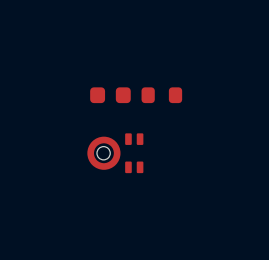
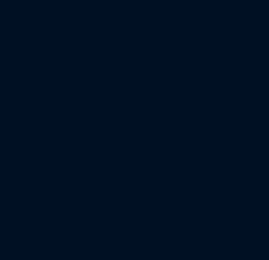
part: (110, 95) -> none
part: (161, 95) -> none
part: (115, 153) -> none

